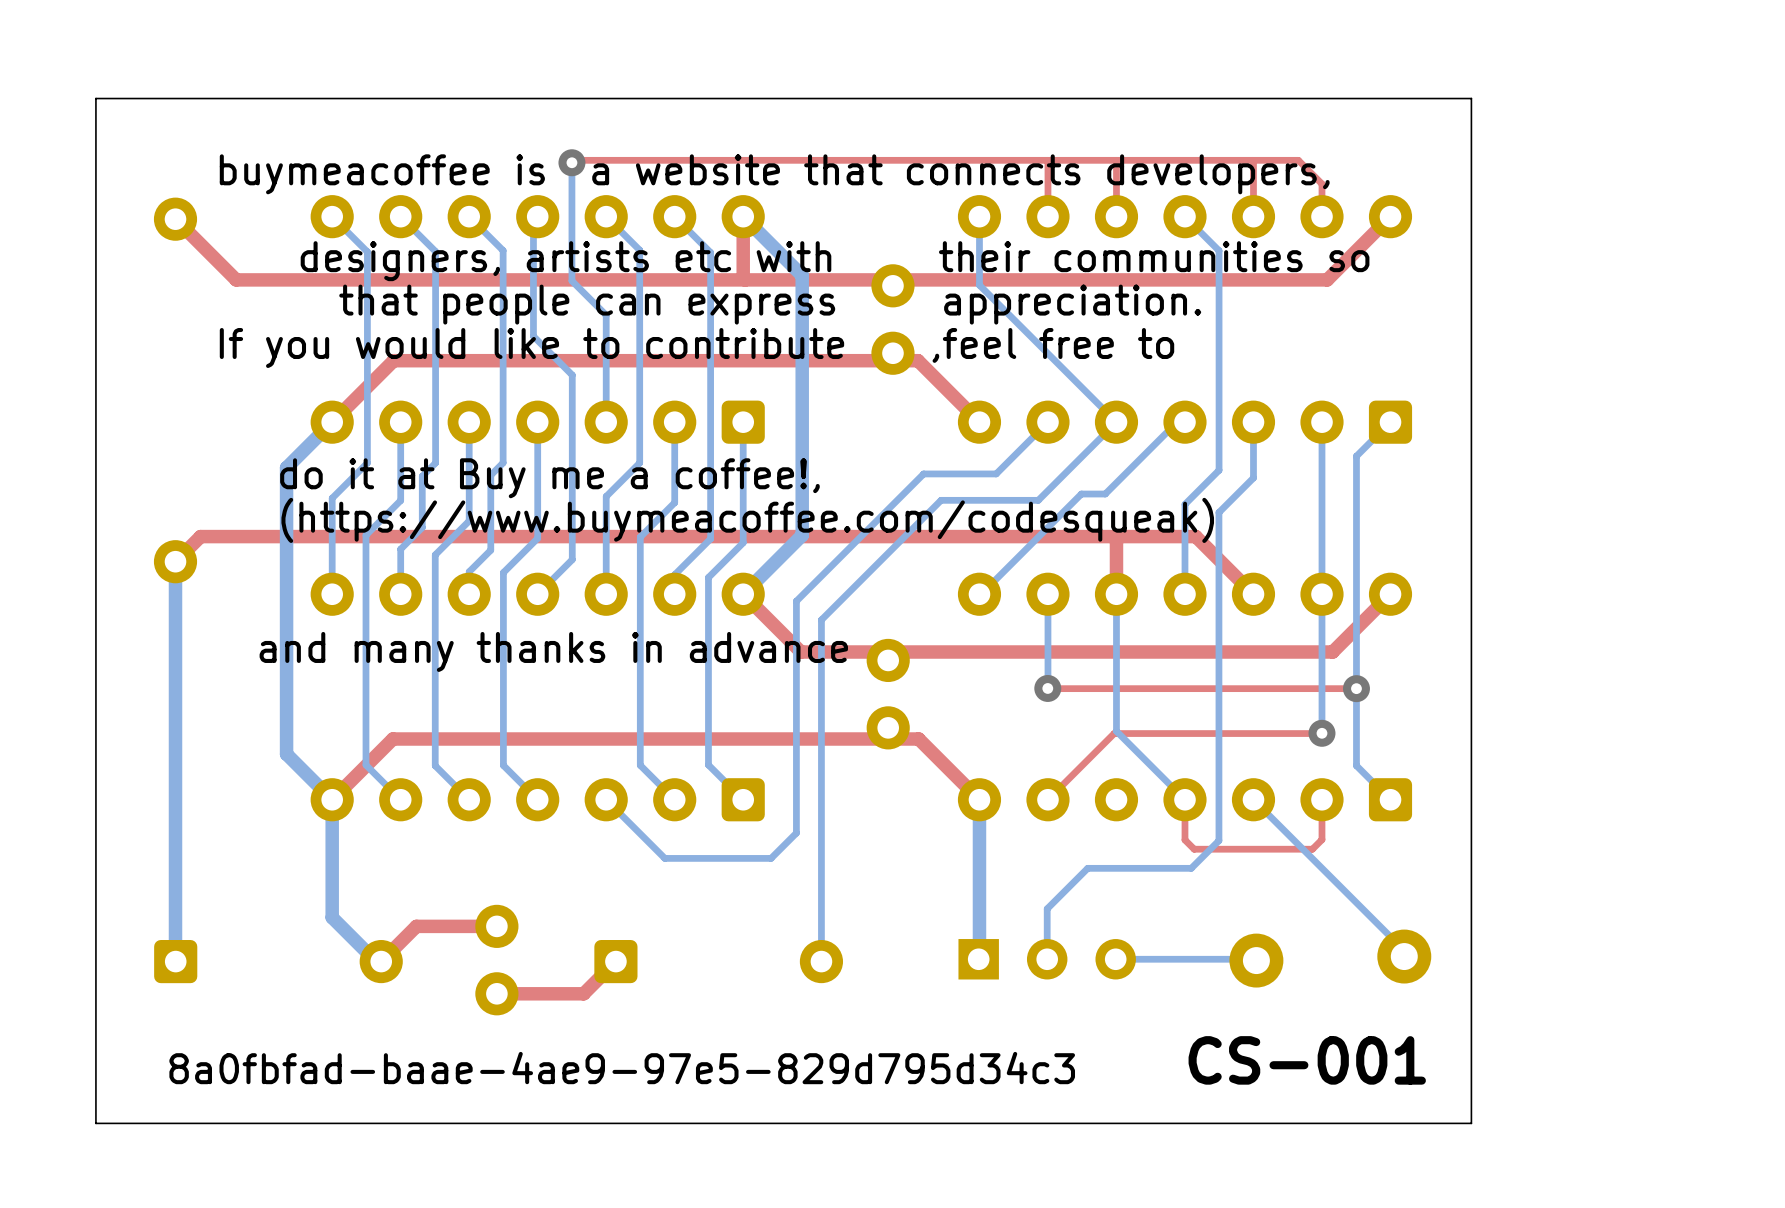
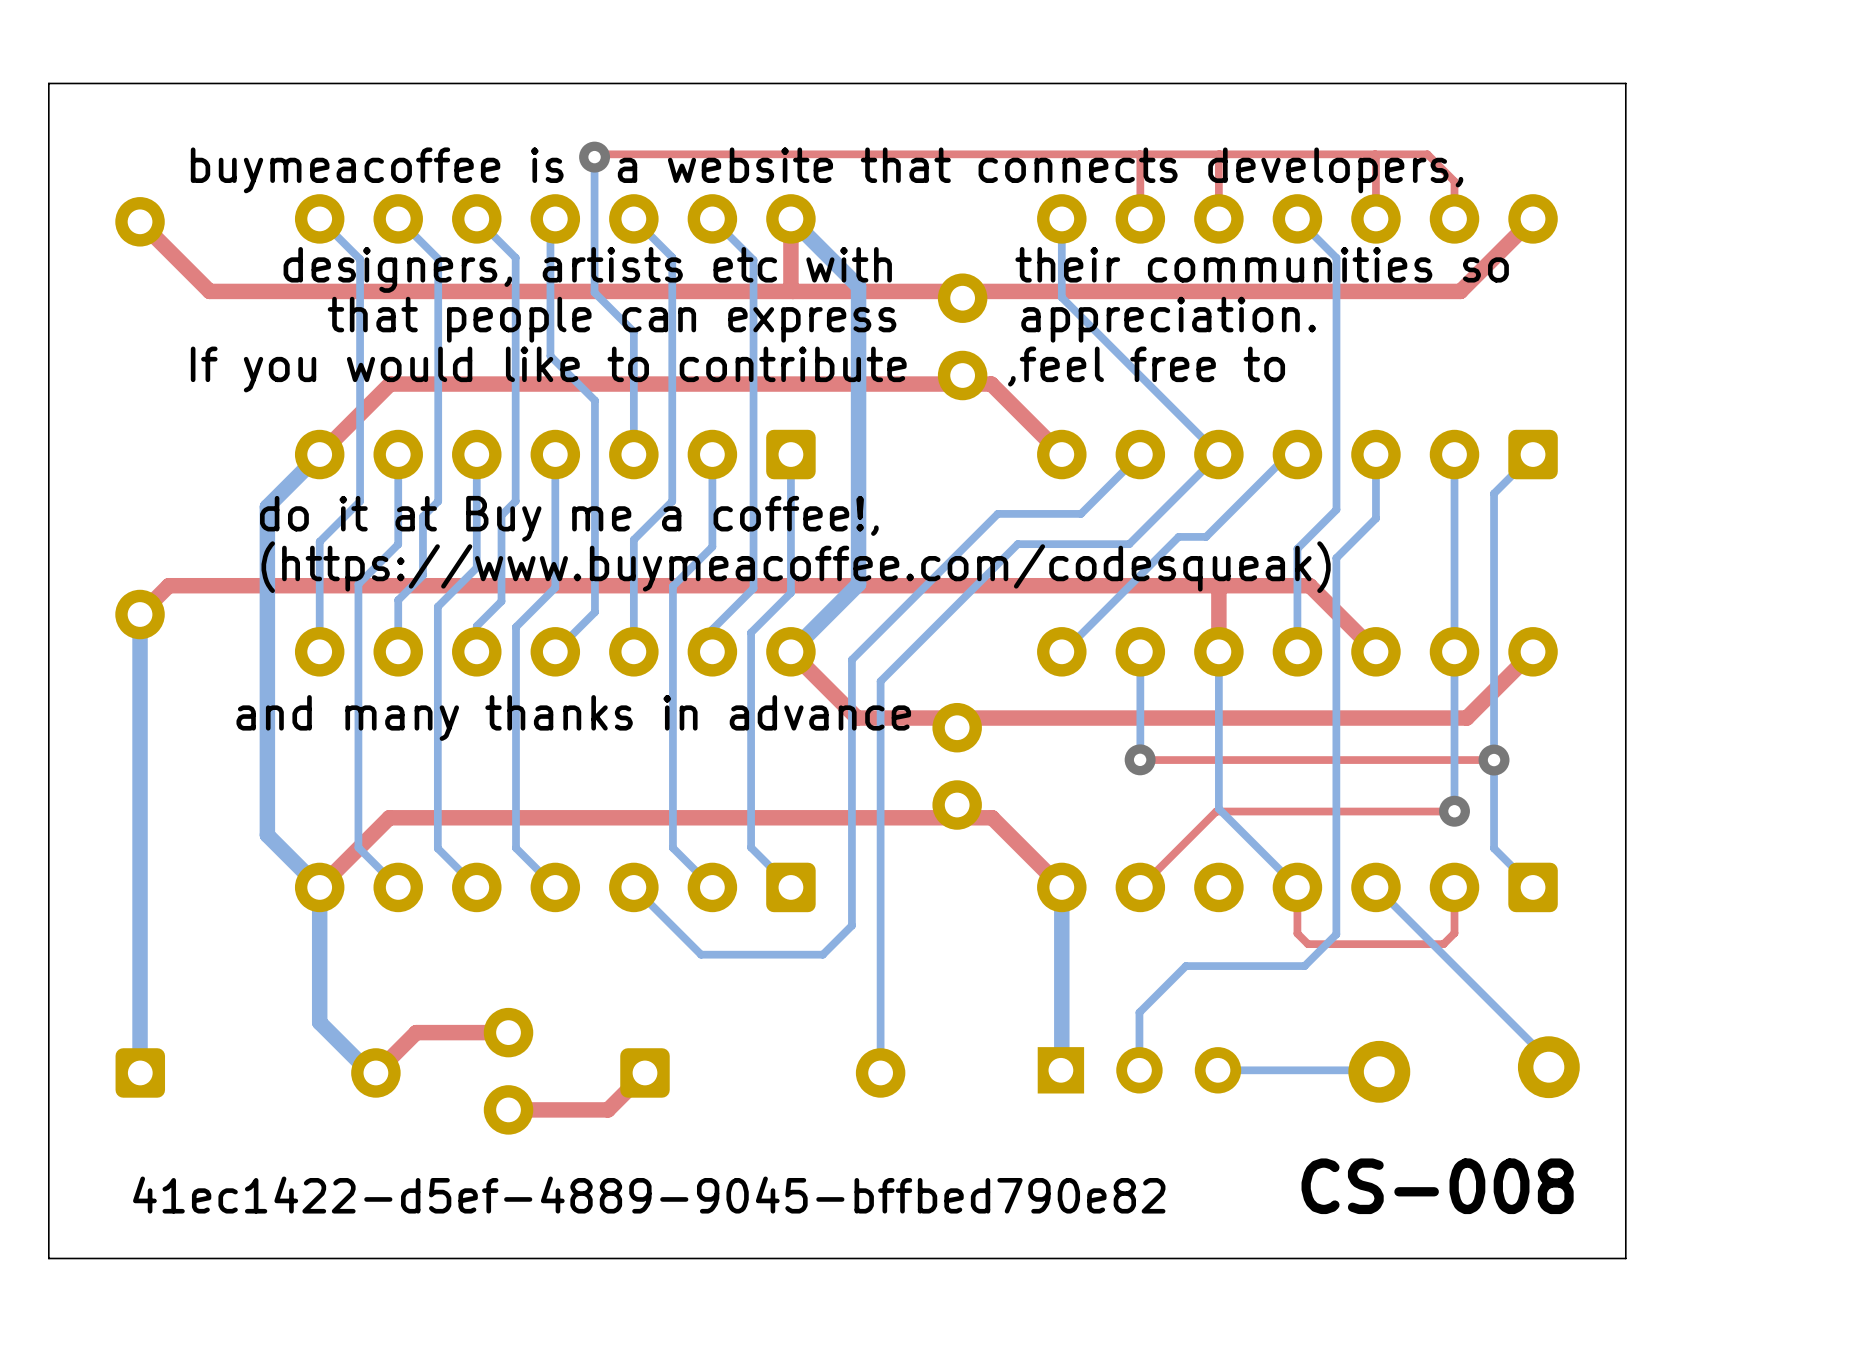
text: CS-001 (1307, 1060) -> CS-008 (1437, 1186)
text: 8a0fbfad-baae-4ae9-97e5-829d795d34c3 (622, 1068) -> 41ec1422-d5ef-4889-9045-bffbed790e82 (649, 1195)

